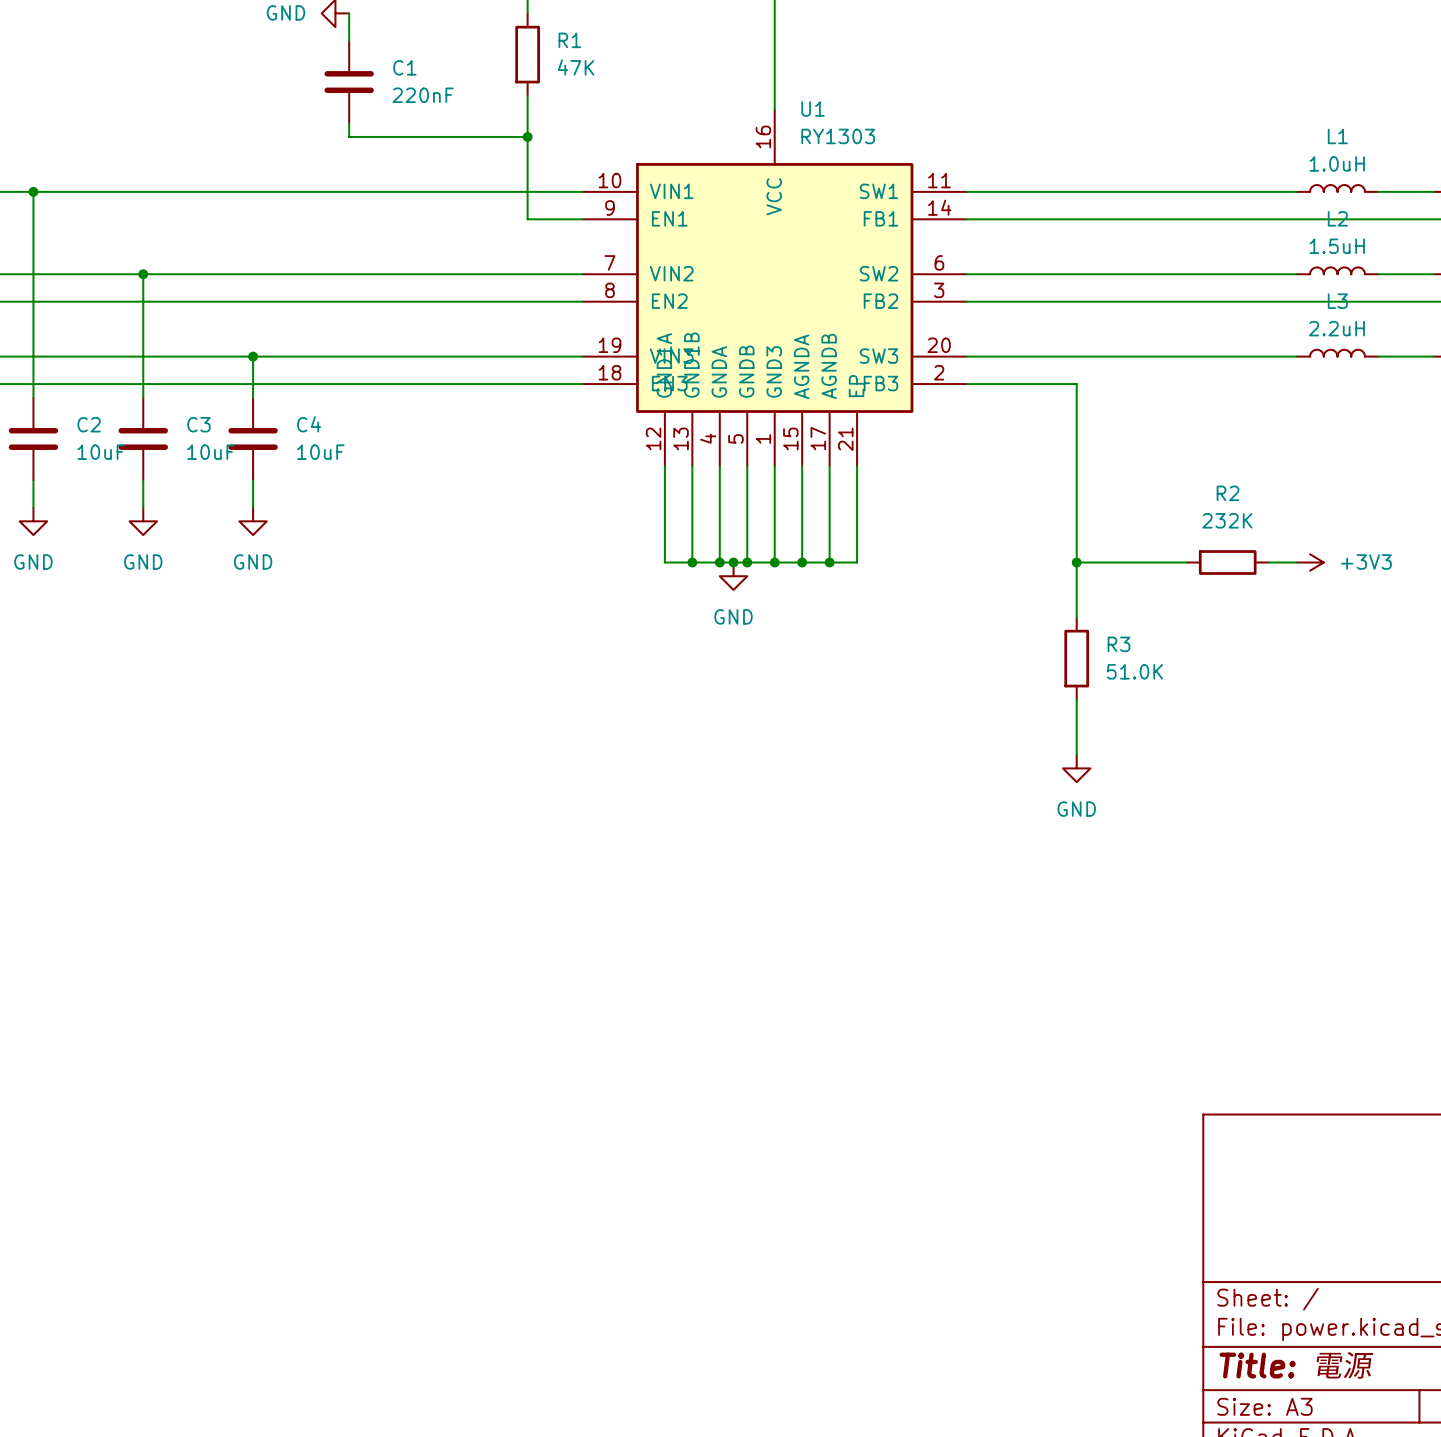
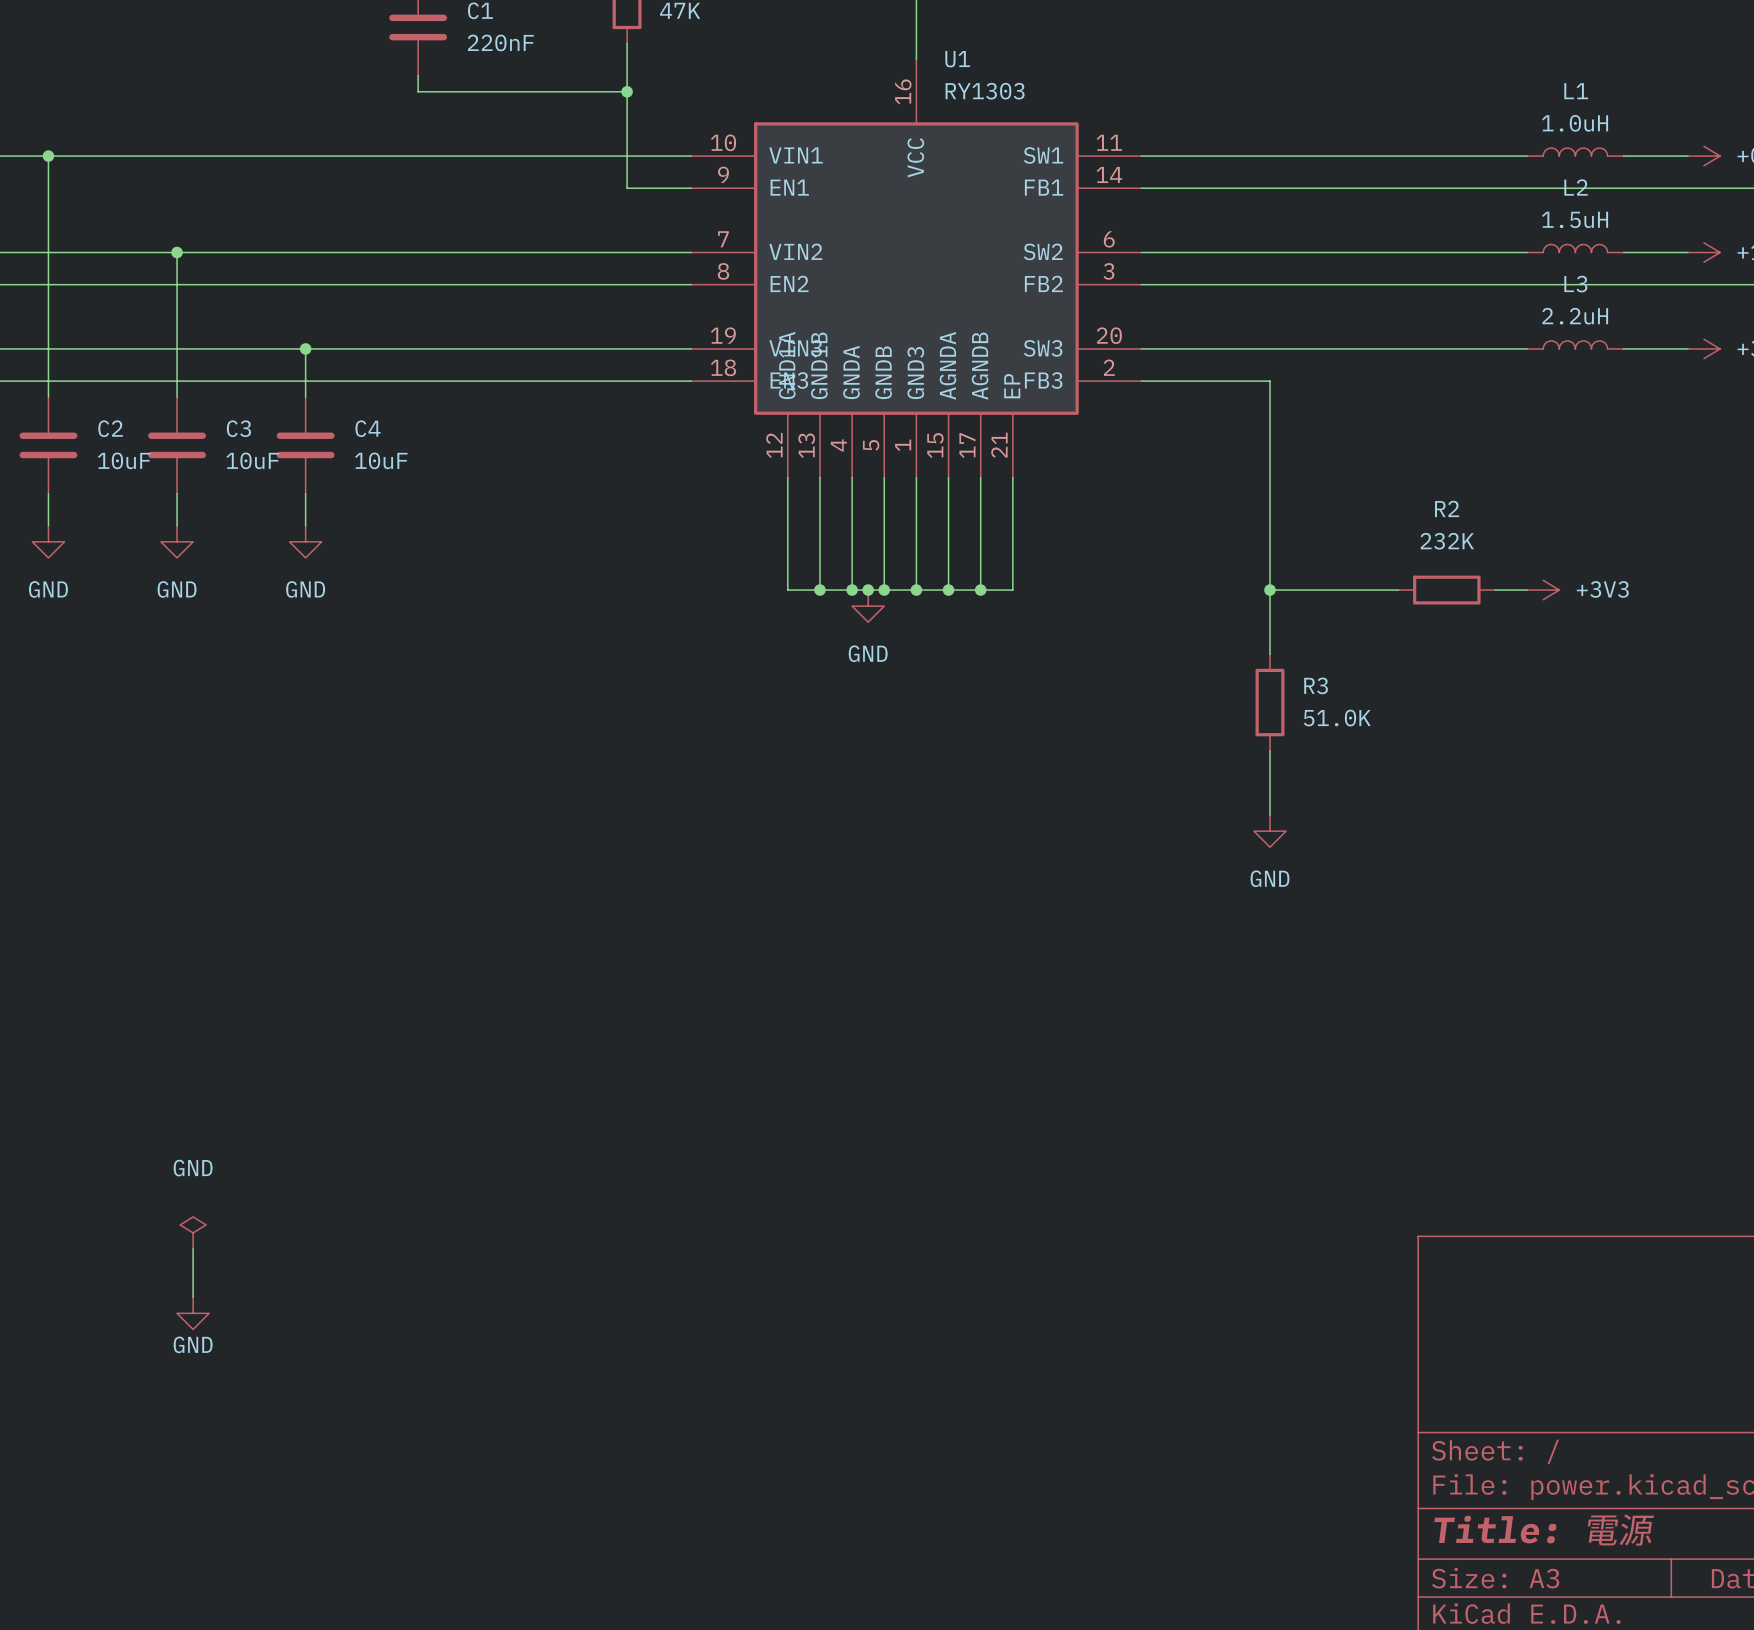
power symbol: none -> GND (193, 1232)
wire: none -> (193, 1249) (193, 1297)
power symbol: none -> GND (193, 1313)

